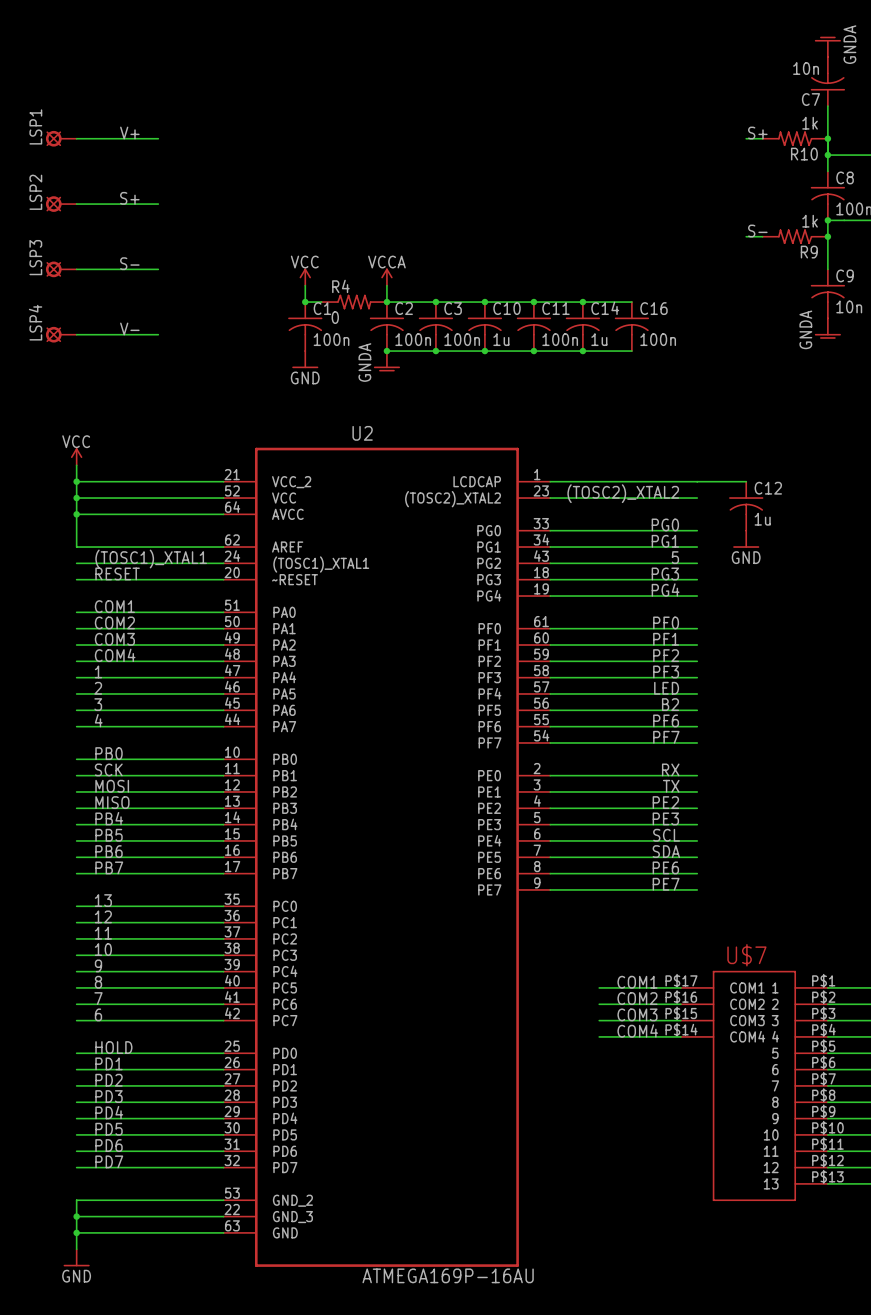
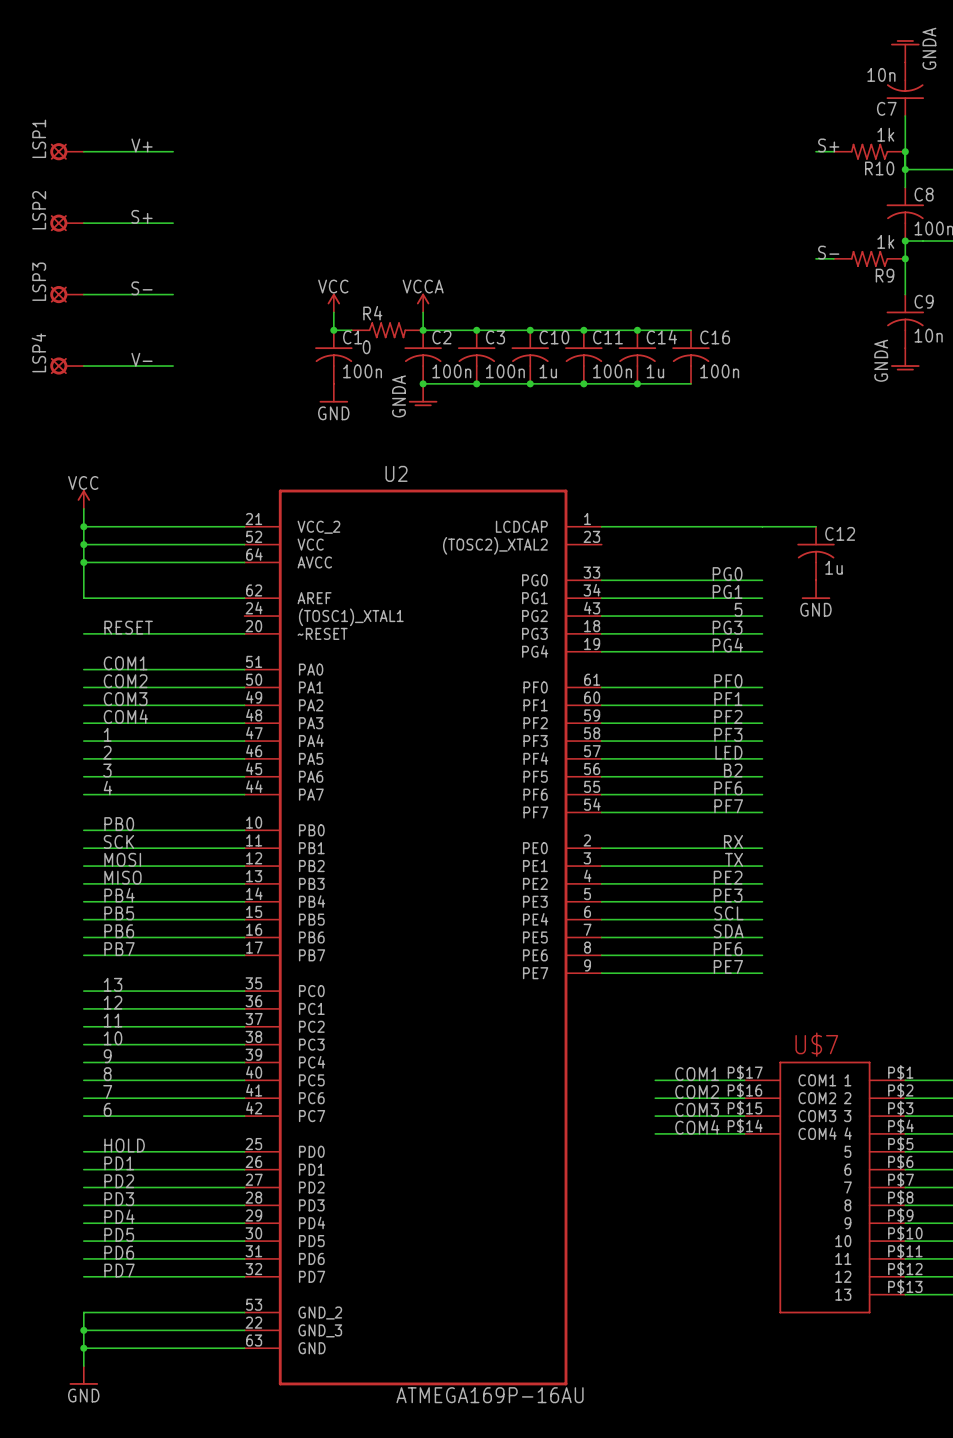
label: (TOSC2)_XTAL2 (623, 493) -> none
wire: (550, 498) (697, 498) -> none
label: (TOSC1)_XTAL1 (151, 558) -> none
wire: (76, 563) (223, 563) -> none

